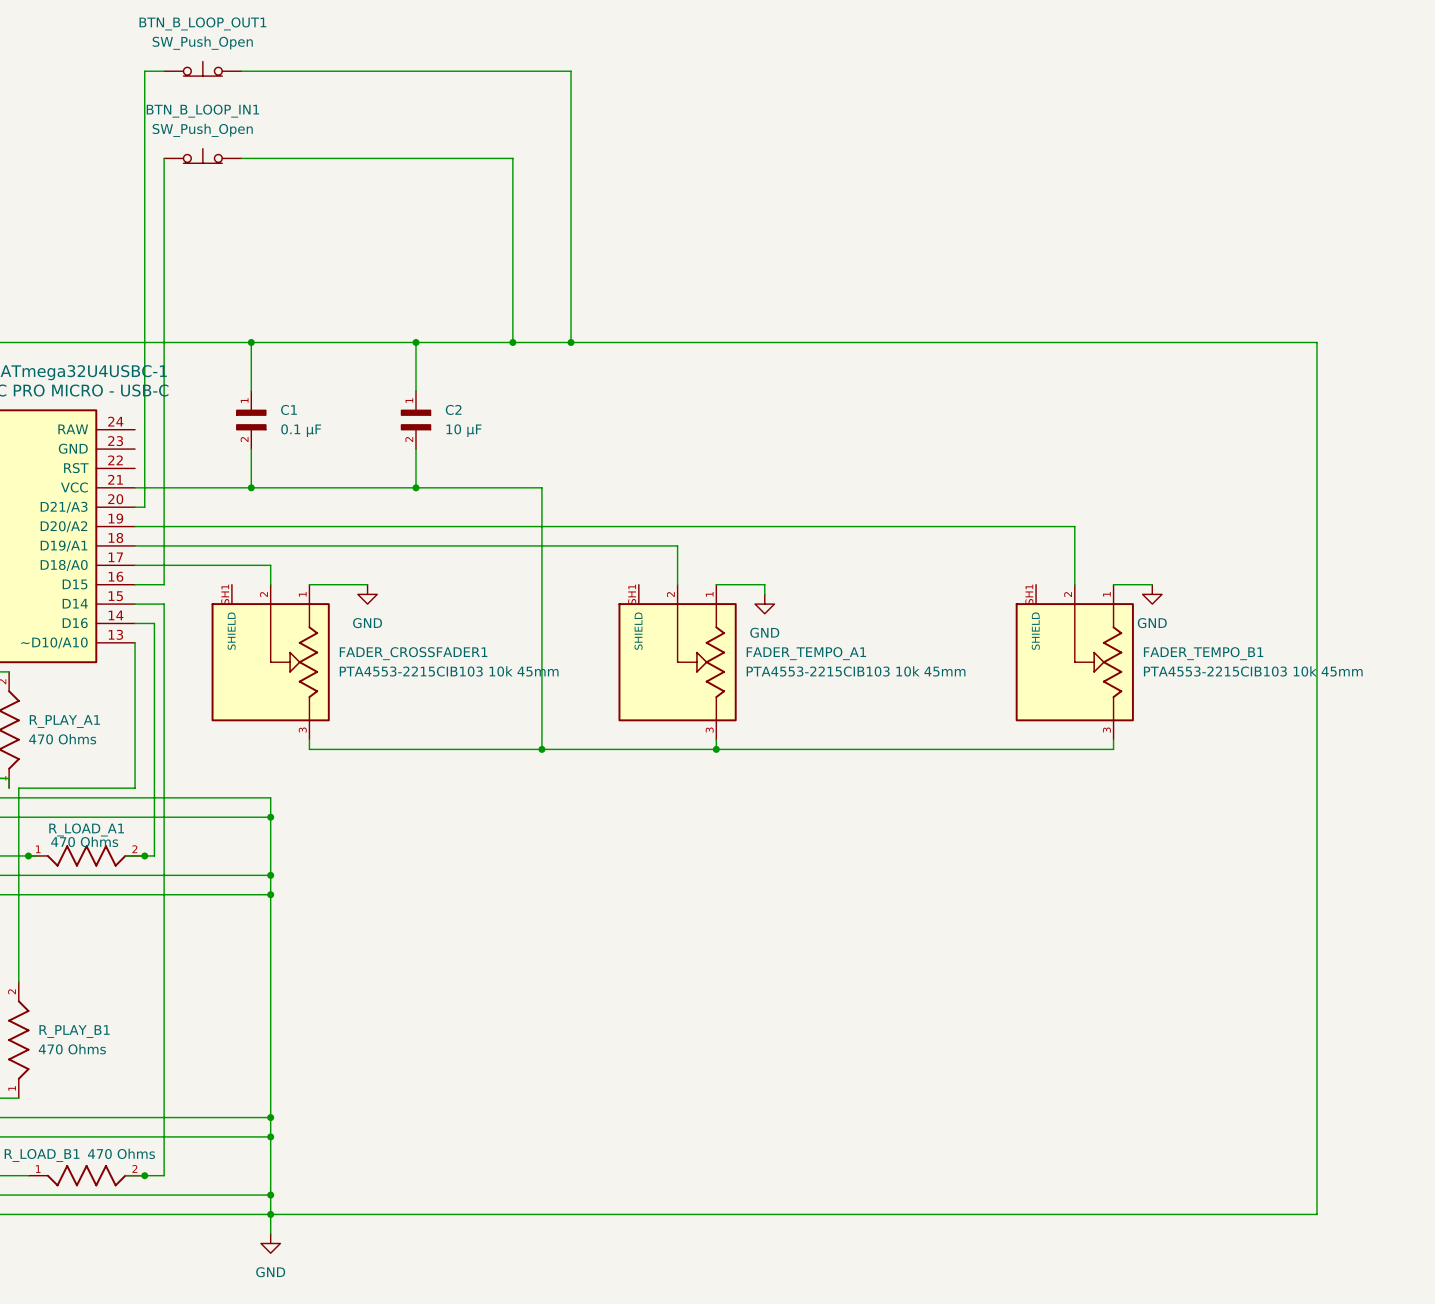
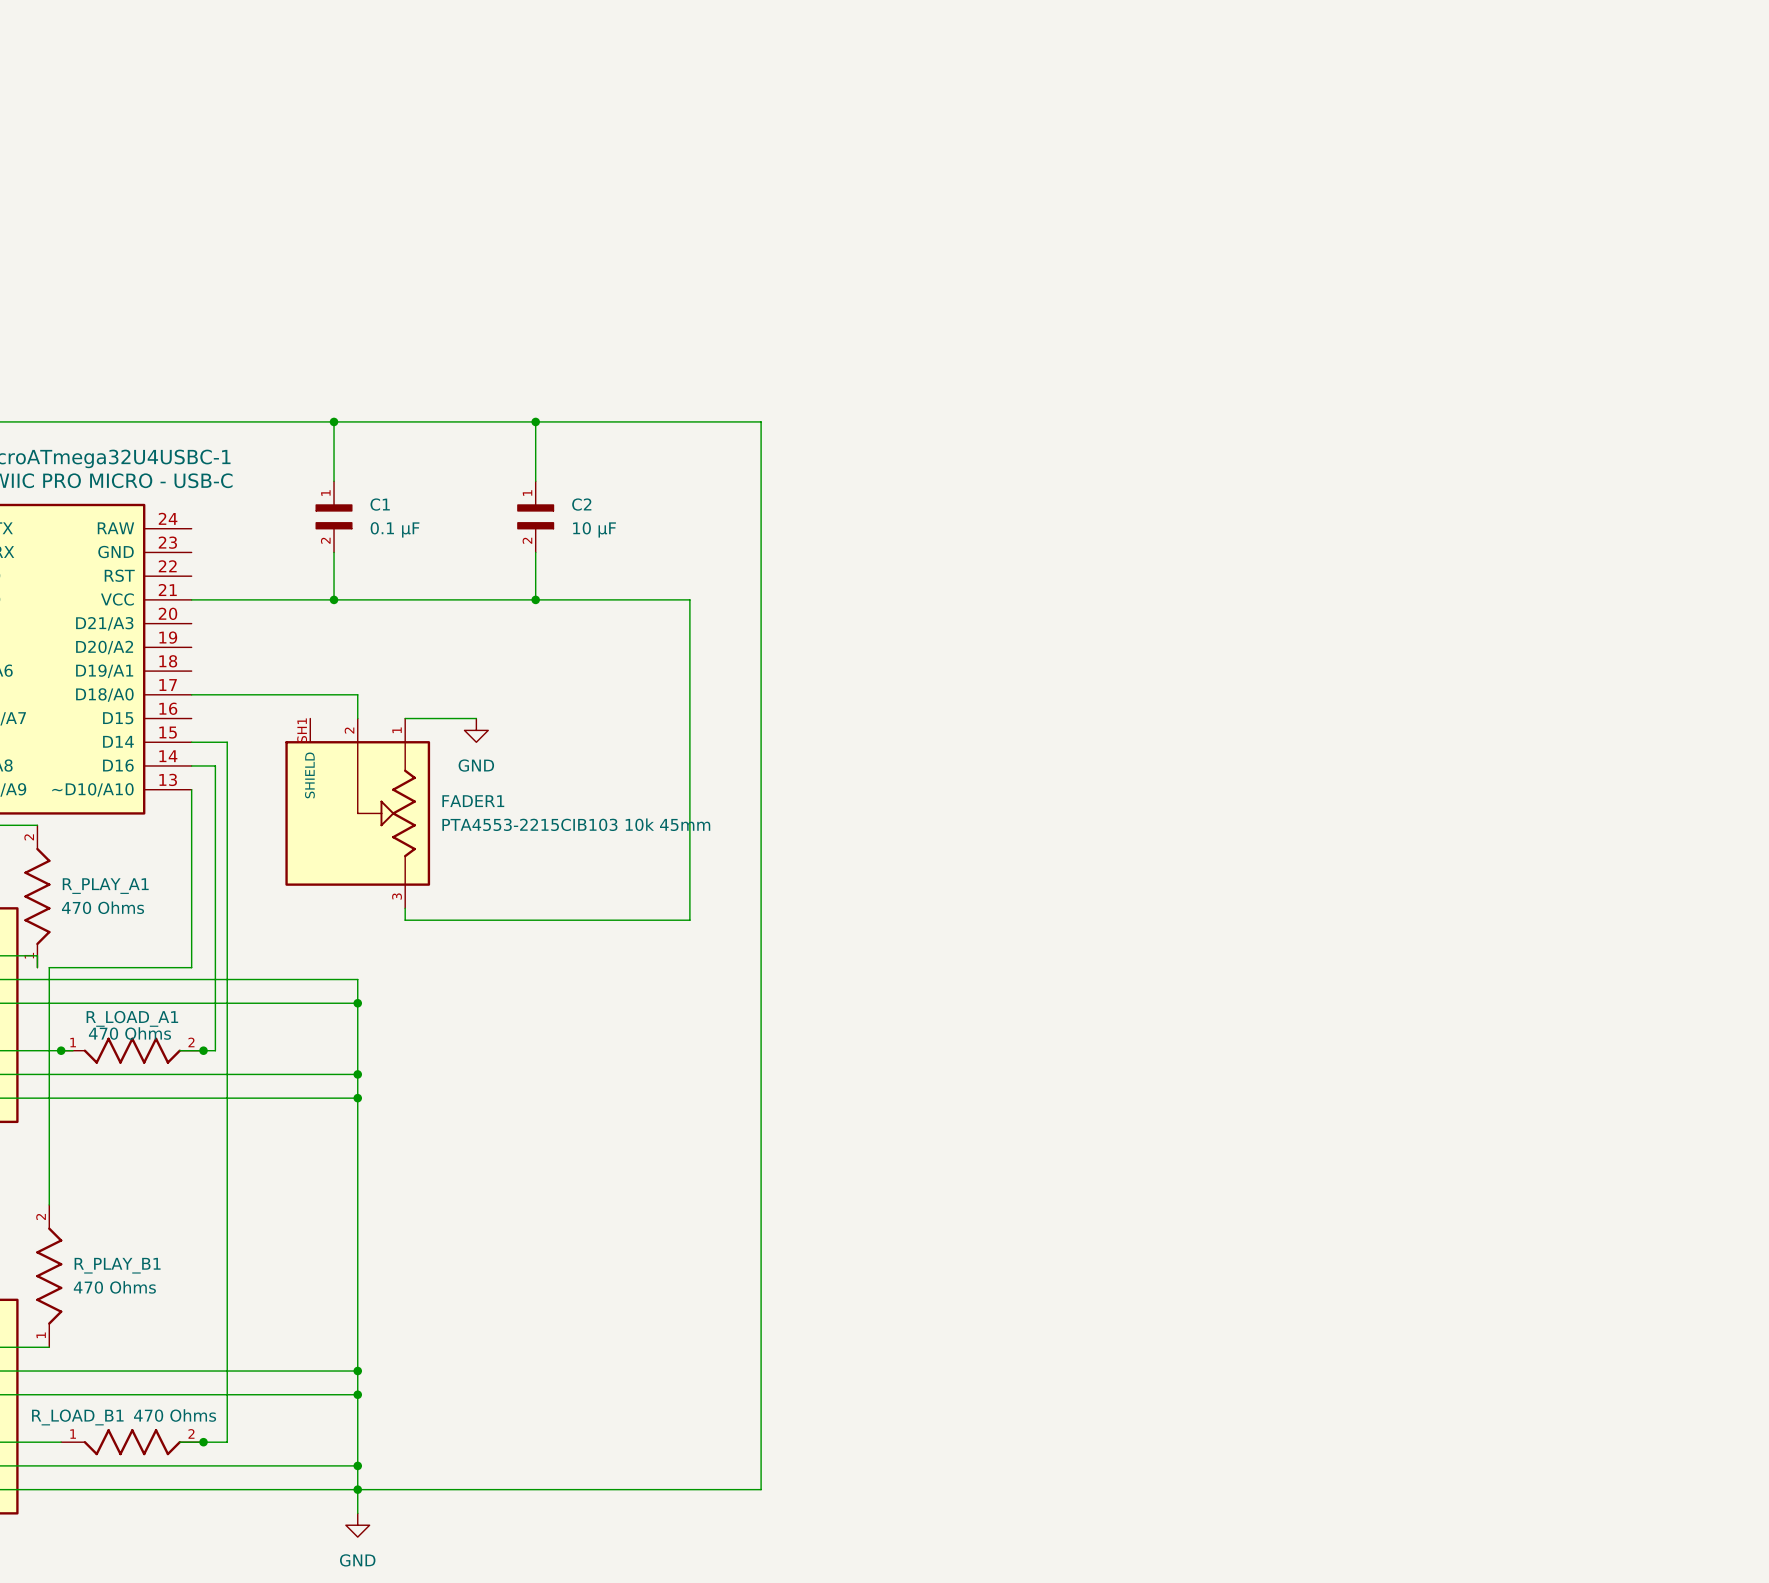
BTN_B_LOOP_OUT1: SW_Push_Open (202, 68) -> none
wire: (164, 71) (144, 71) (144, 507) (135, 507) -> none
wire: (241, 71) (571, 71) (571, 342) -> none
BTN_B_LOOP_IN1: SW_Push_Open (202, 156) -> none
wire: (164, 158) (164, 584) (135, 584) -> none
wire: (241, 158) (512, 158) (512, 342) -> none
junction: (512, 342) -> none
junction: (571, 342) -> none
wire: (600, 342) (1317, 342) (1317, 1214) (600, 1214) -> (761, 421) (761, 1489)
wire: (135, 526) (1074, 526) (1074, 584) -> none
wire: (135, 545) (677, 545) (677, 584) -> none
wire: (716, 584) (764, 584) (764, 594) -> none
wire: (1113, 584) (1152, 584) -> none
power symbol: GND (1152, 594) -> none
power symbol: GND (764, 604) -> none
FADER_CROSSFADER1 name: FADER_CROSSFADER1 (413, 653) -> FADER1 (473, 801)
FADER_TEMPO_A1: PTA4553-2215CIB103 10k 45mm (677, 662) -> none
FADER_TEMPO_B1: PTA4553-2215CIB103 10k 45mm (1074, 662) -> none
wire: (716, 739) (716, 749) -> none
wire: (1113, 739) (1113, 749) (541, 749) -> none
junction: (541, 749) -> none
junction: (716, 749) -> none

